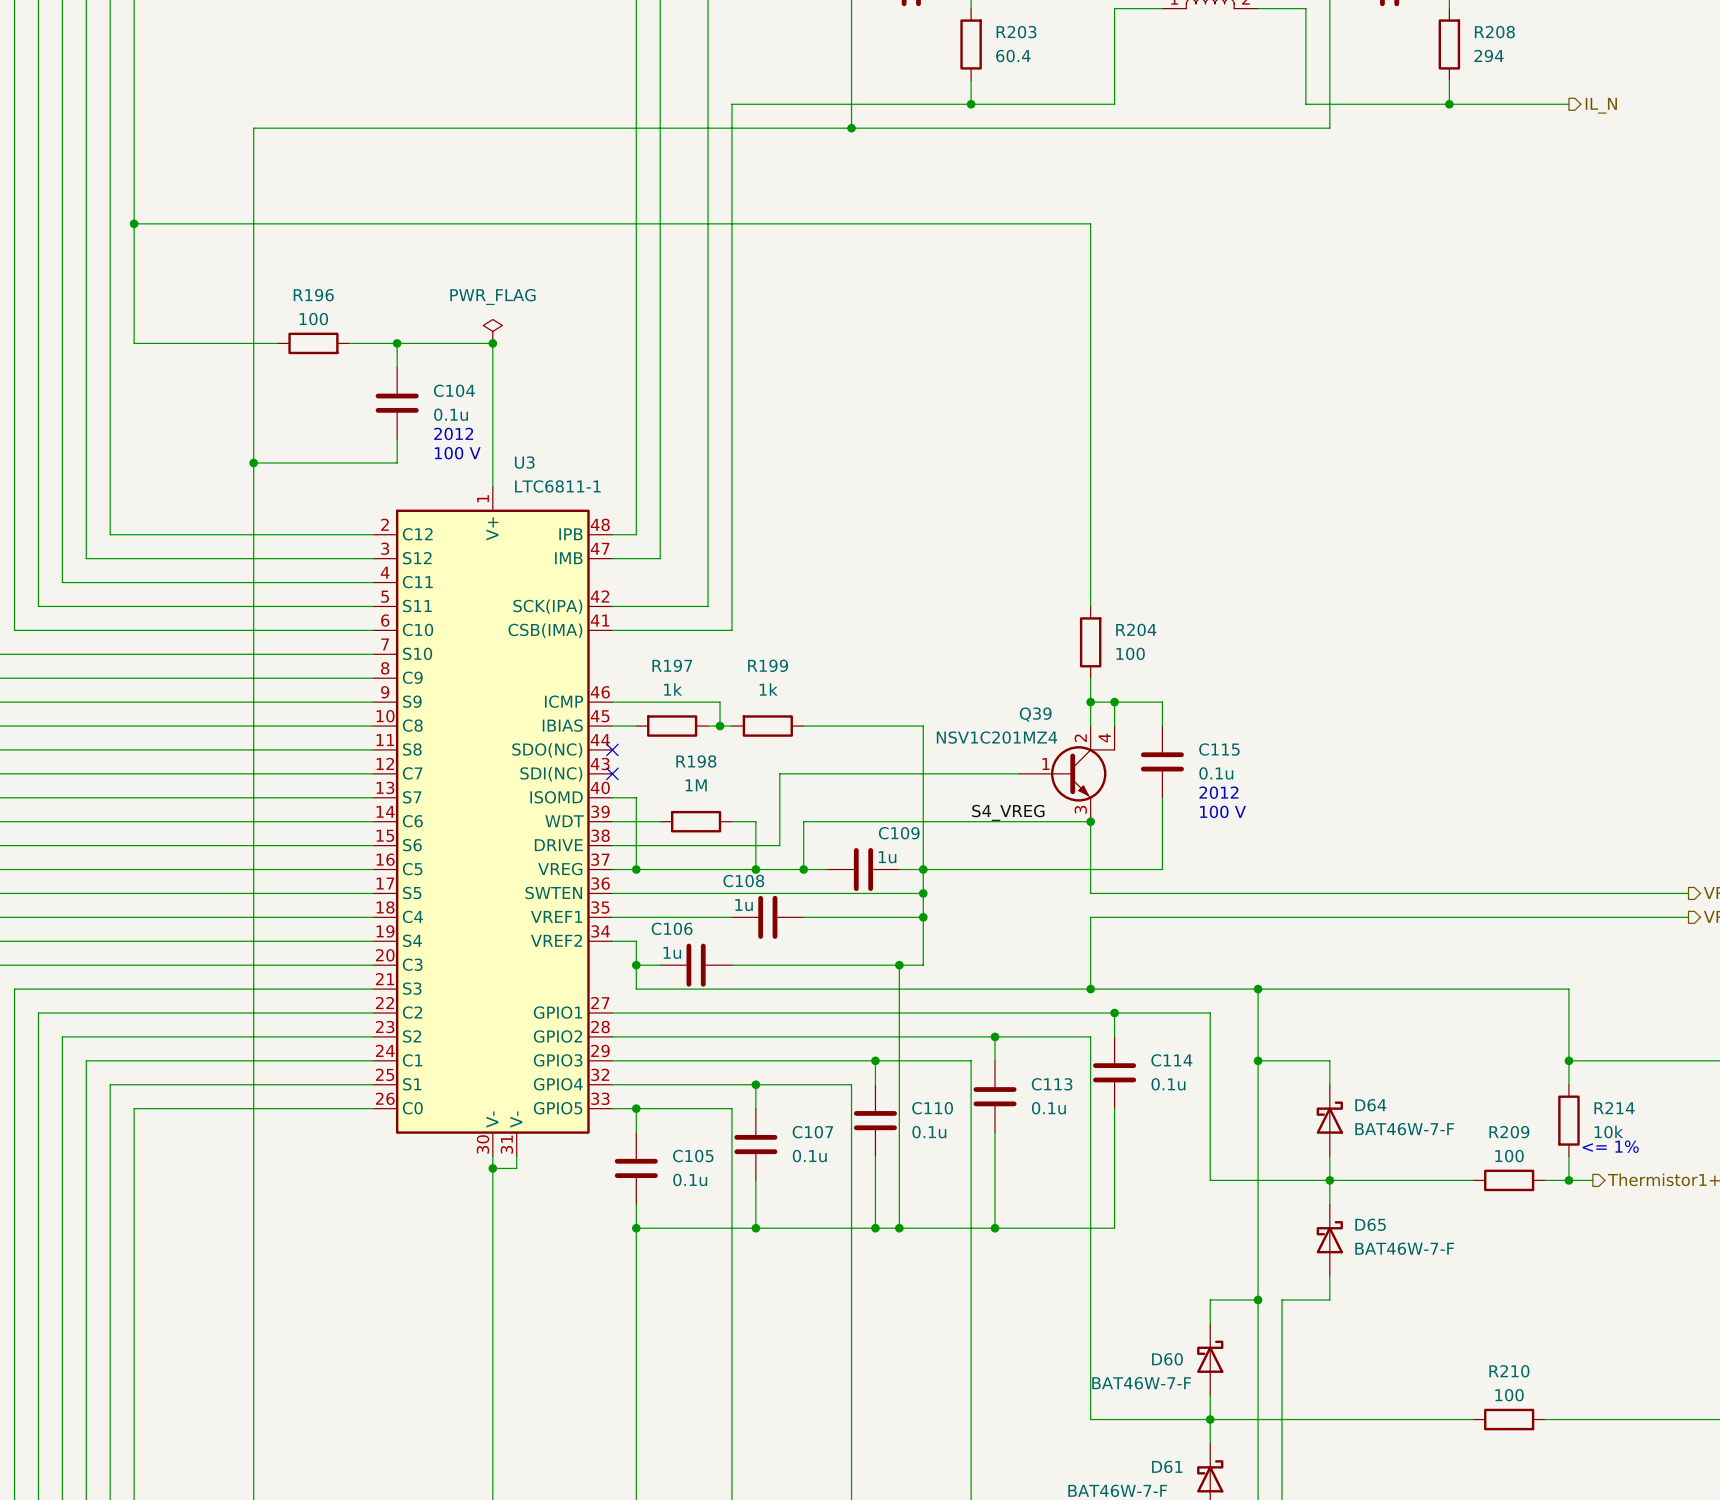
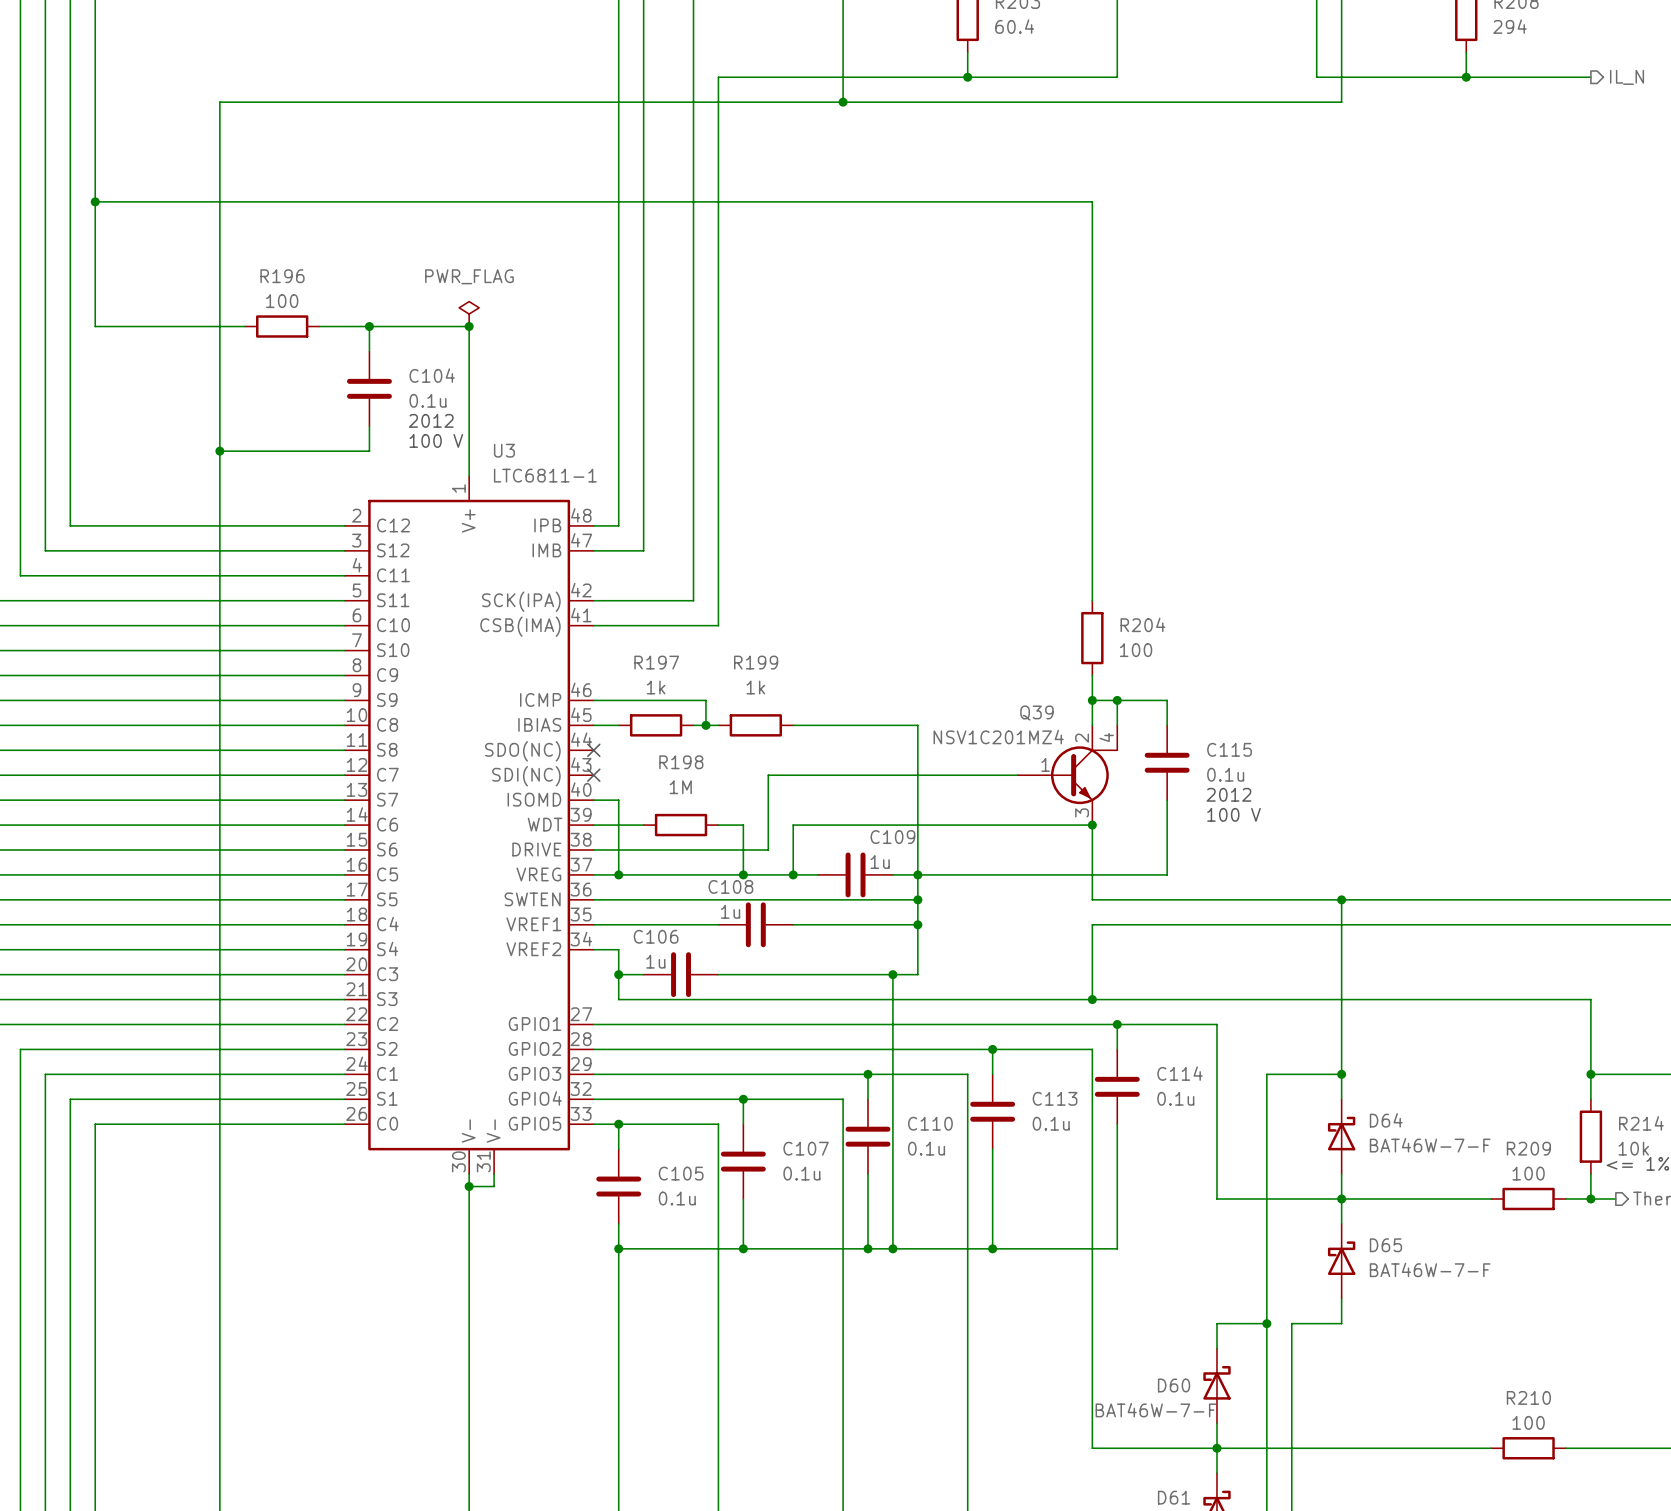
label: S4_VREG (1008, 812) -> none
wire: none -> (1341, 899) (1341, 1074)
junction: none -> (1341, 899)
wire: (1258, 989) (1258, 1060) -> none
junction: (1258, 989) -> none
junction: (1258, 1060) -> none
junction: none -> (1341, 1074)

